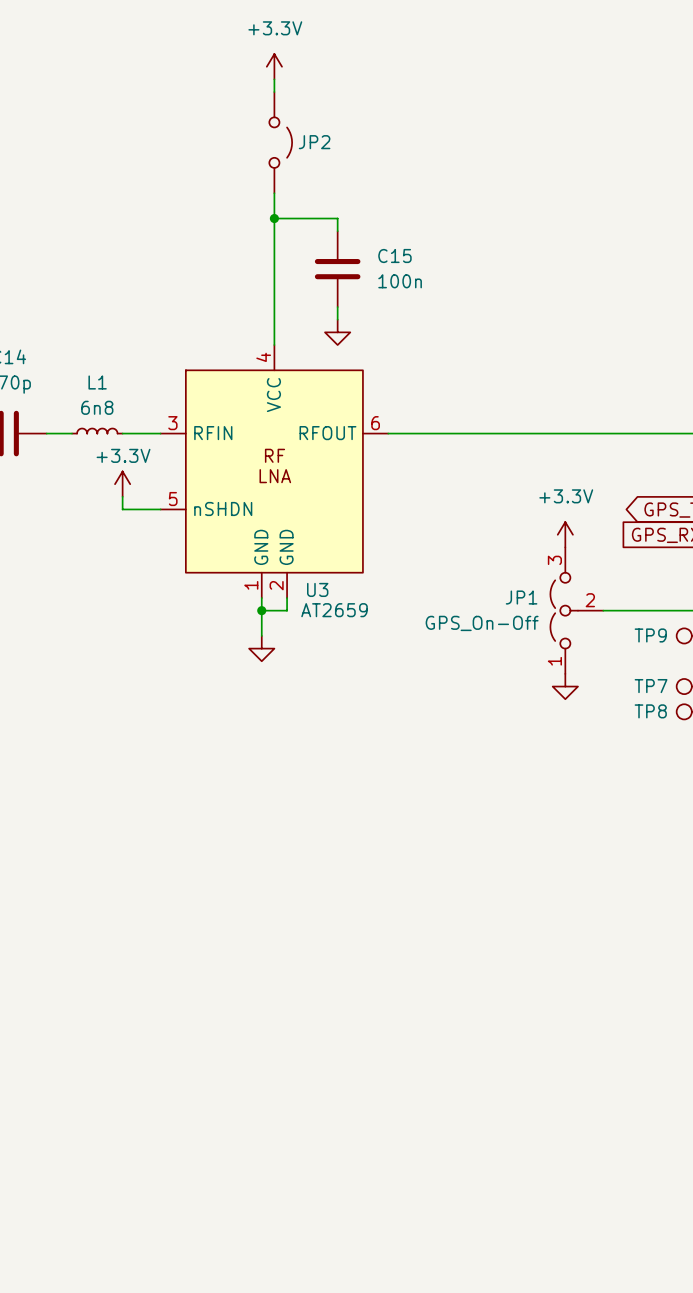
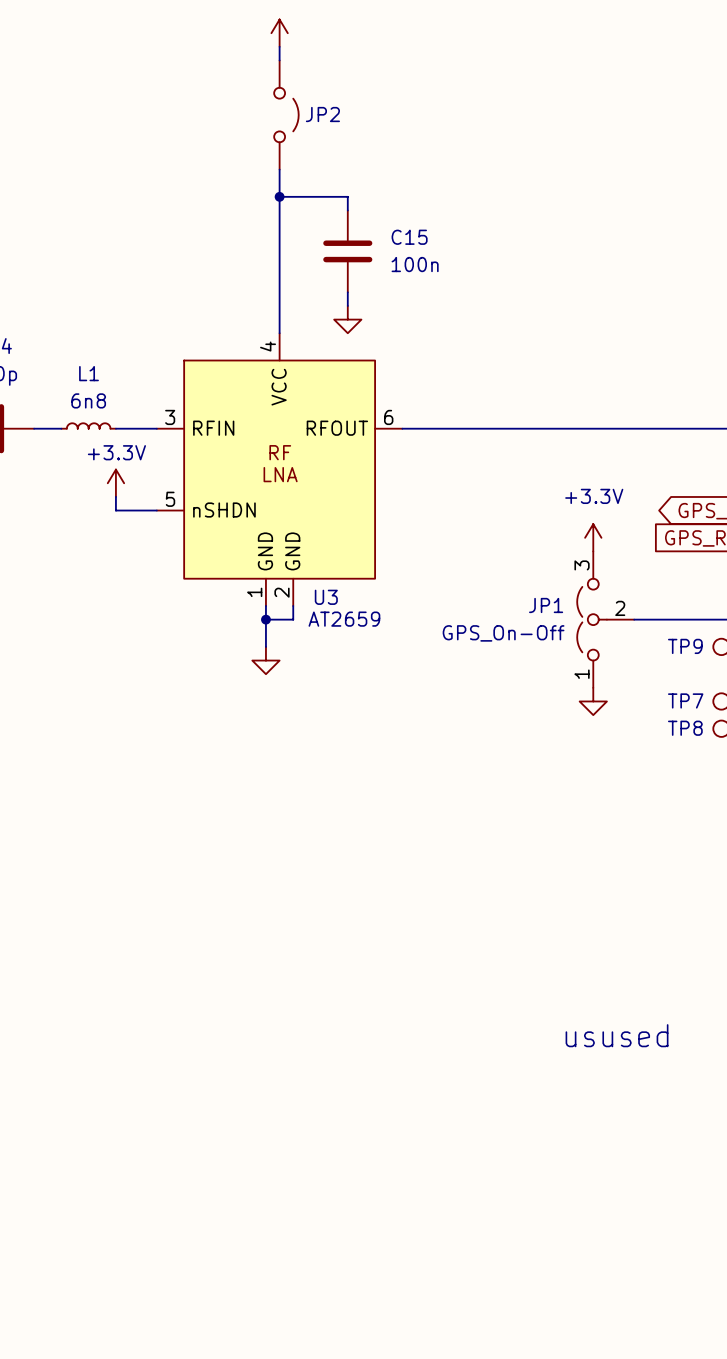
text: none -> usused (617, 1035)

